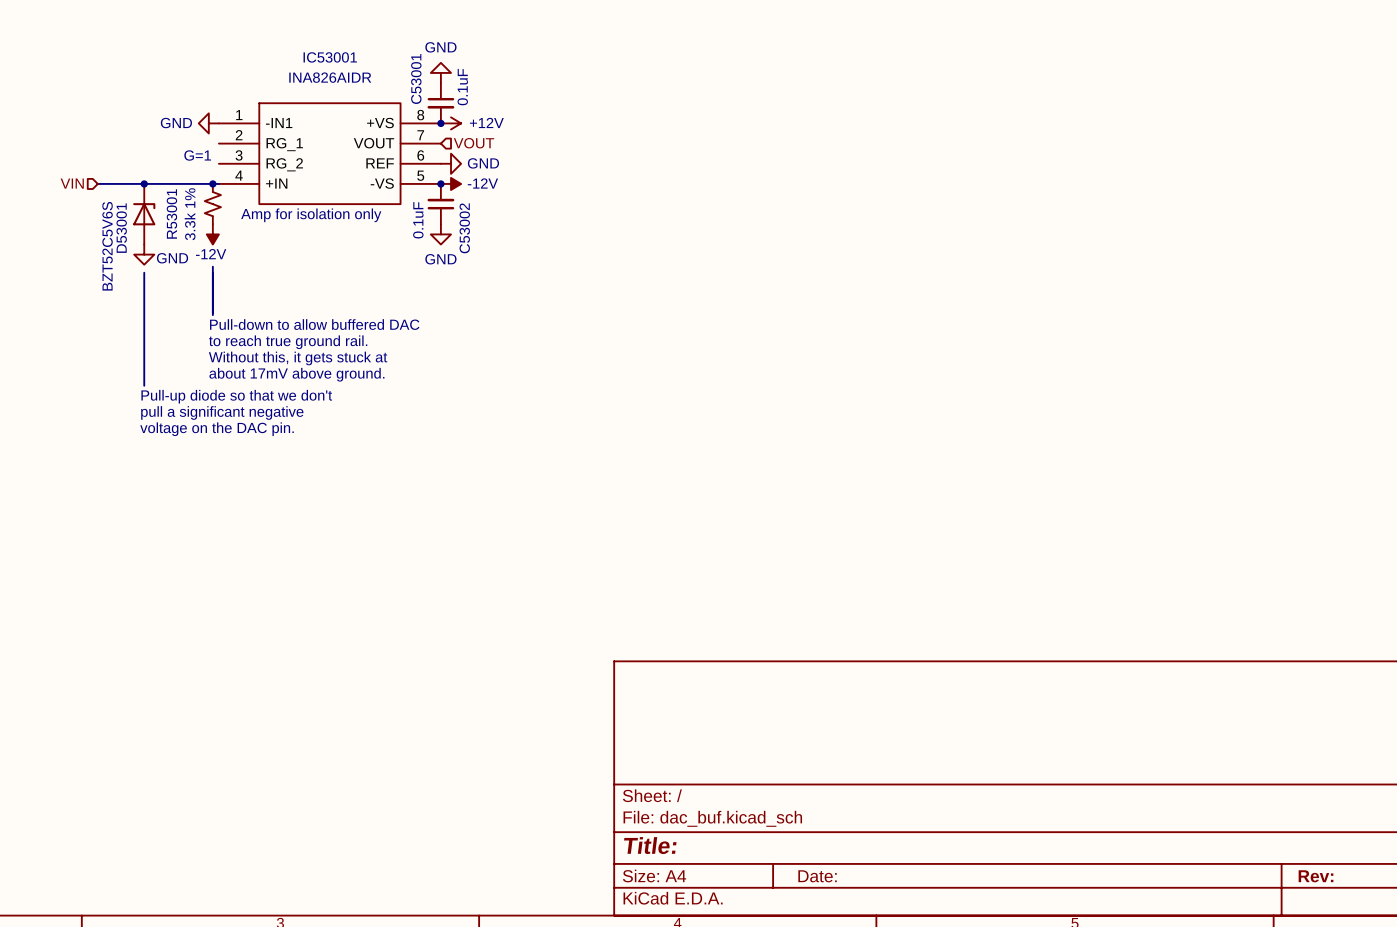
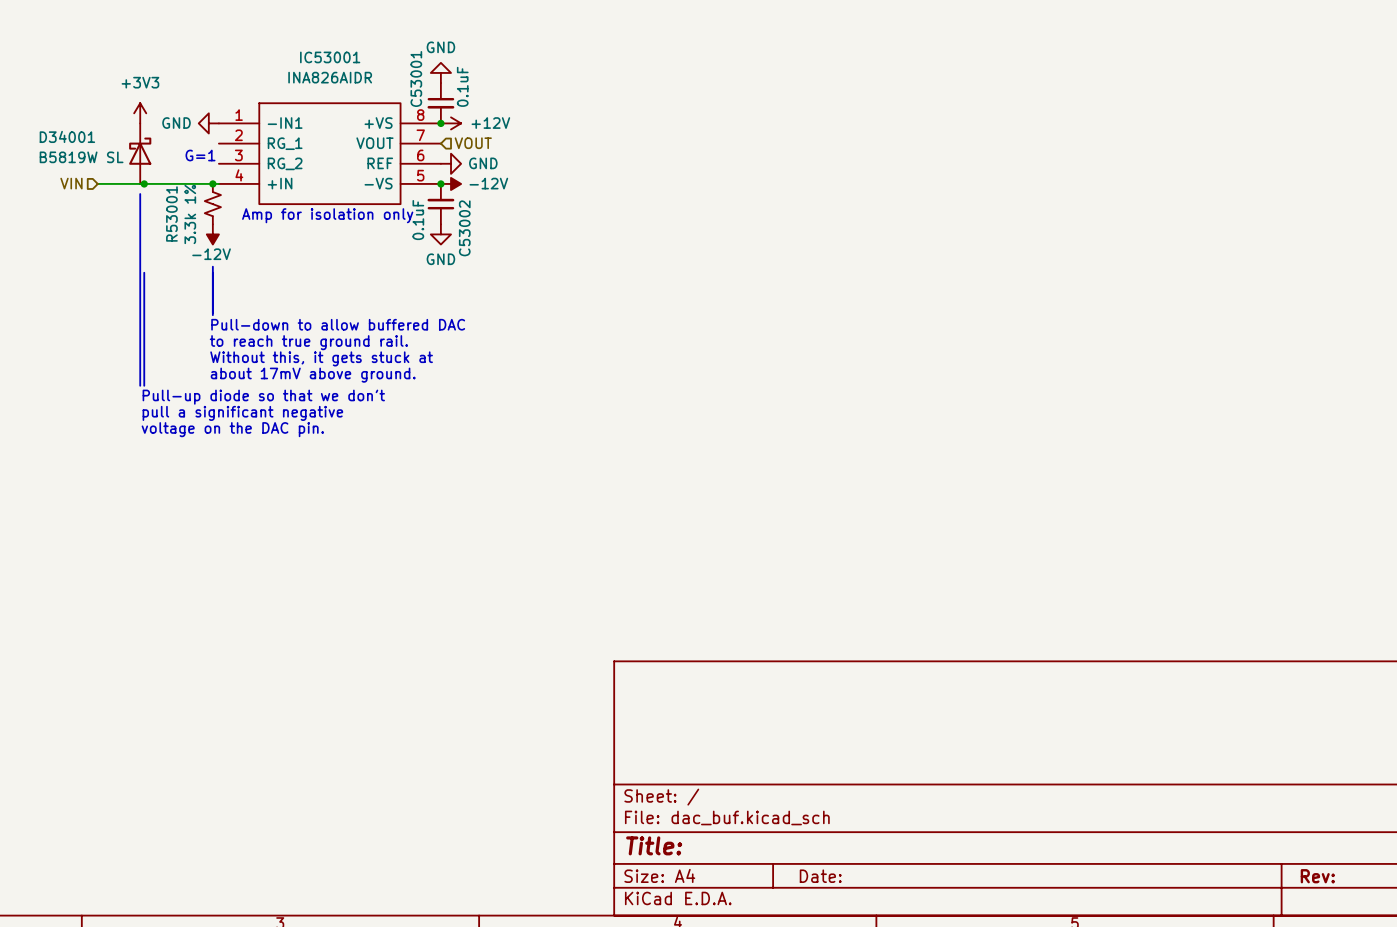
power symbol: none -> +3V3 (140, 113)
D34001: none -> B5819W SL (140, 153)
line: none -> (140, 194) (140, 385)
D53001: BZT52C5V6S (144, 214) -> none
power symbol: GND (144, 254) -> none

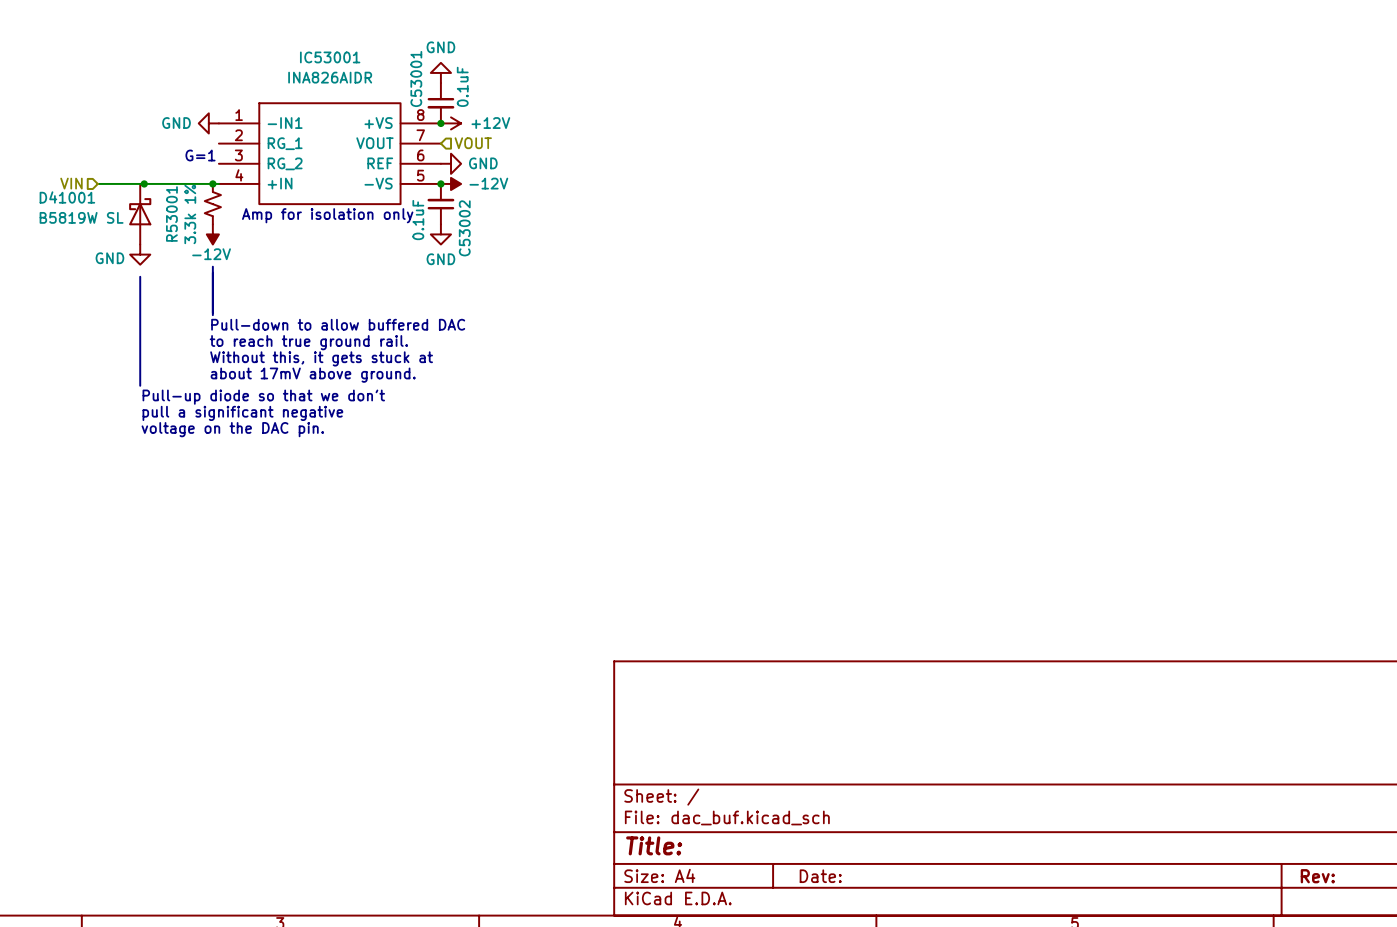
power symbol: +3V3 (140, 113) -> none
D34001: B5819W SL (140, 153) -> none
line: (140, 194) (140, 276) -> none
D41001: none -> B5819W SL (140, 214)
power symbol: none -> GND (140, 254)
line: (144, 272) (144, 385) -> none

